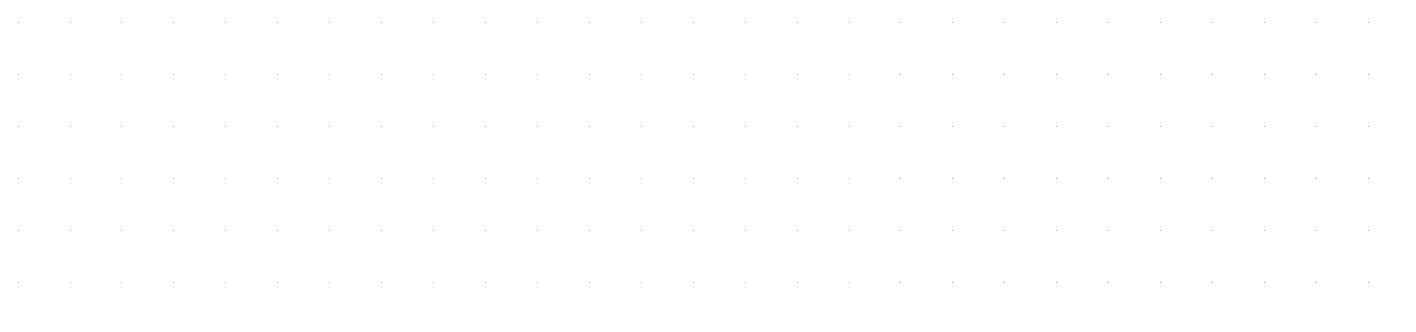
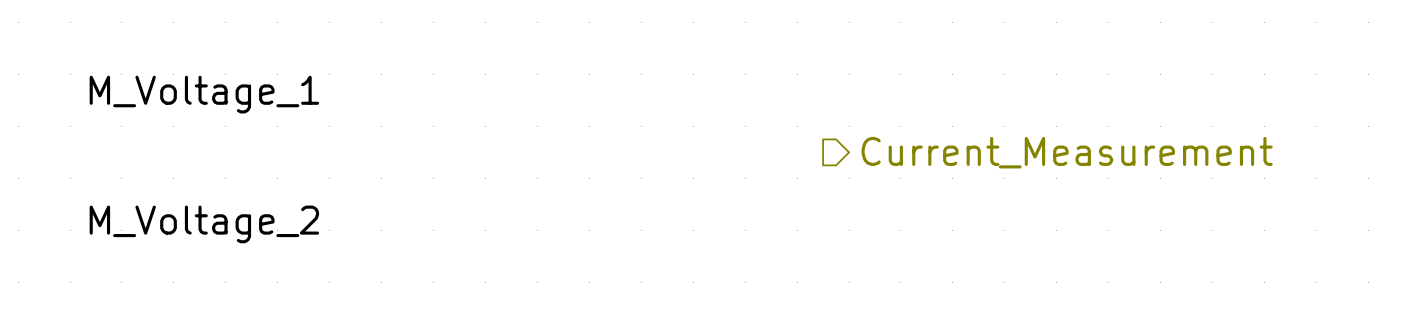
label: none -> M_Voltage_1 (204, 94)
hierarchical label: none -> Current_Measurement (1067, 152)
label: none -> M_Voltage_2 (204, 224)

